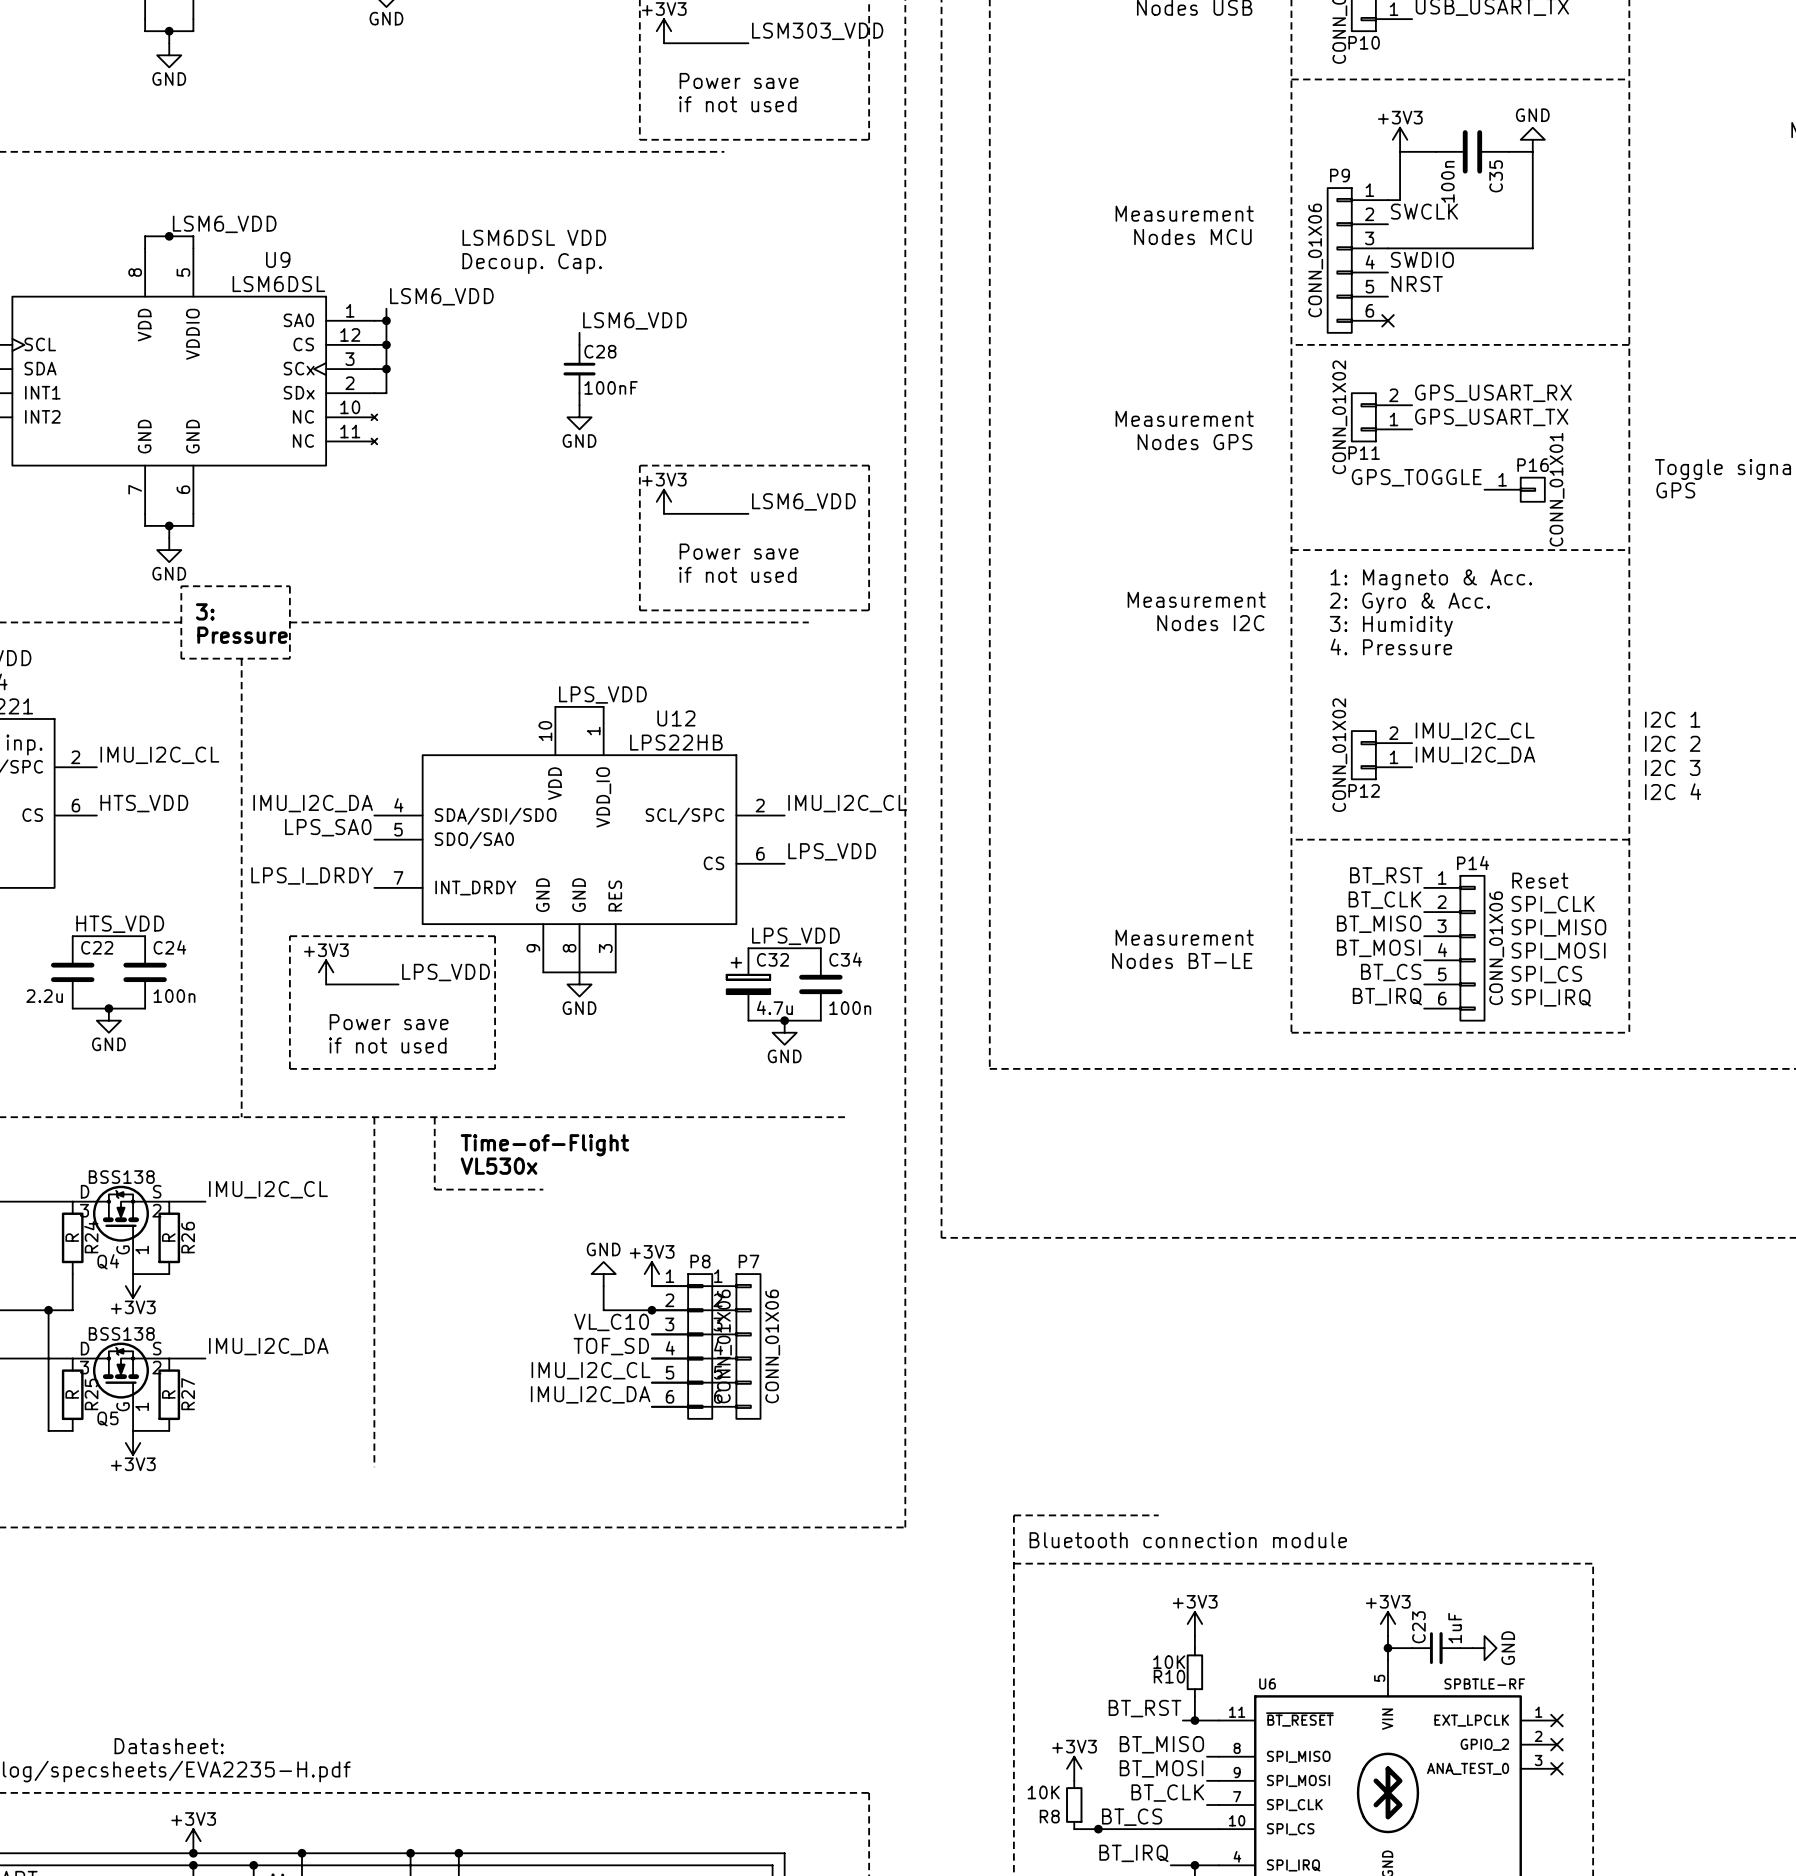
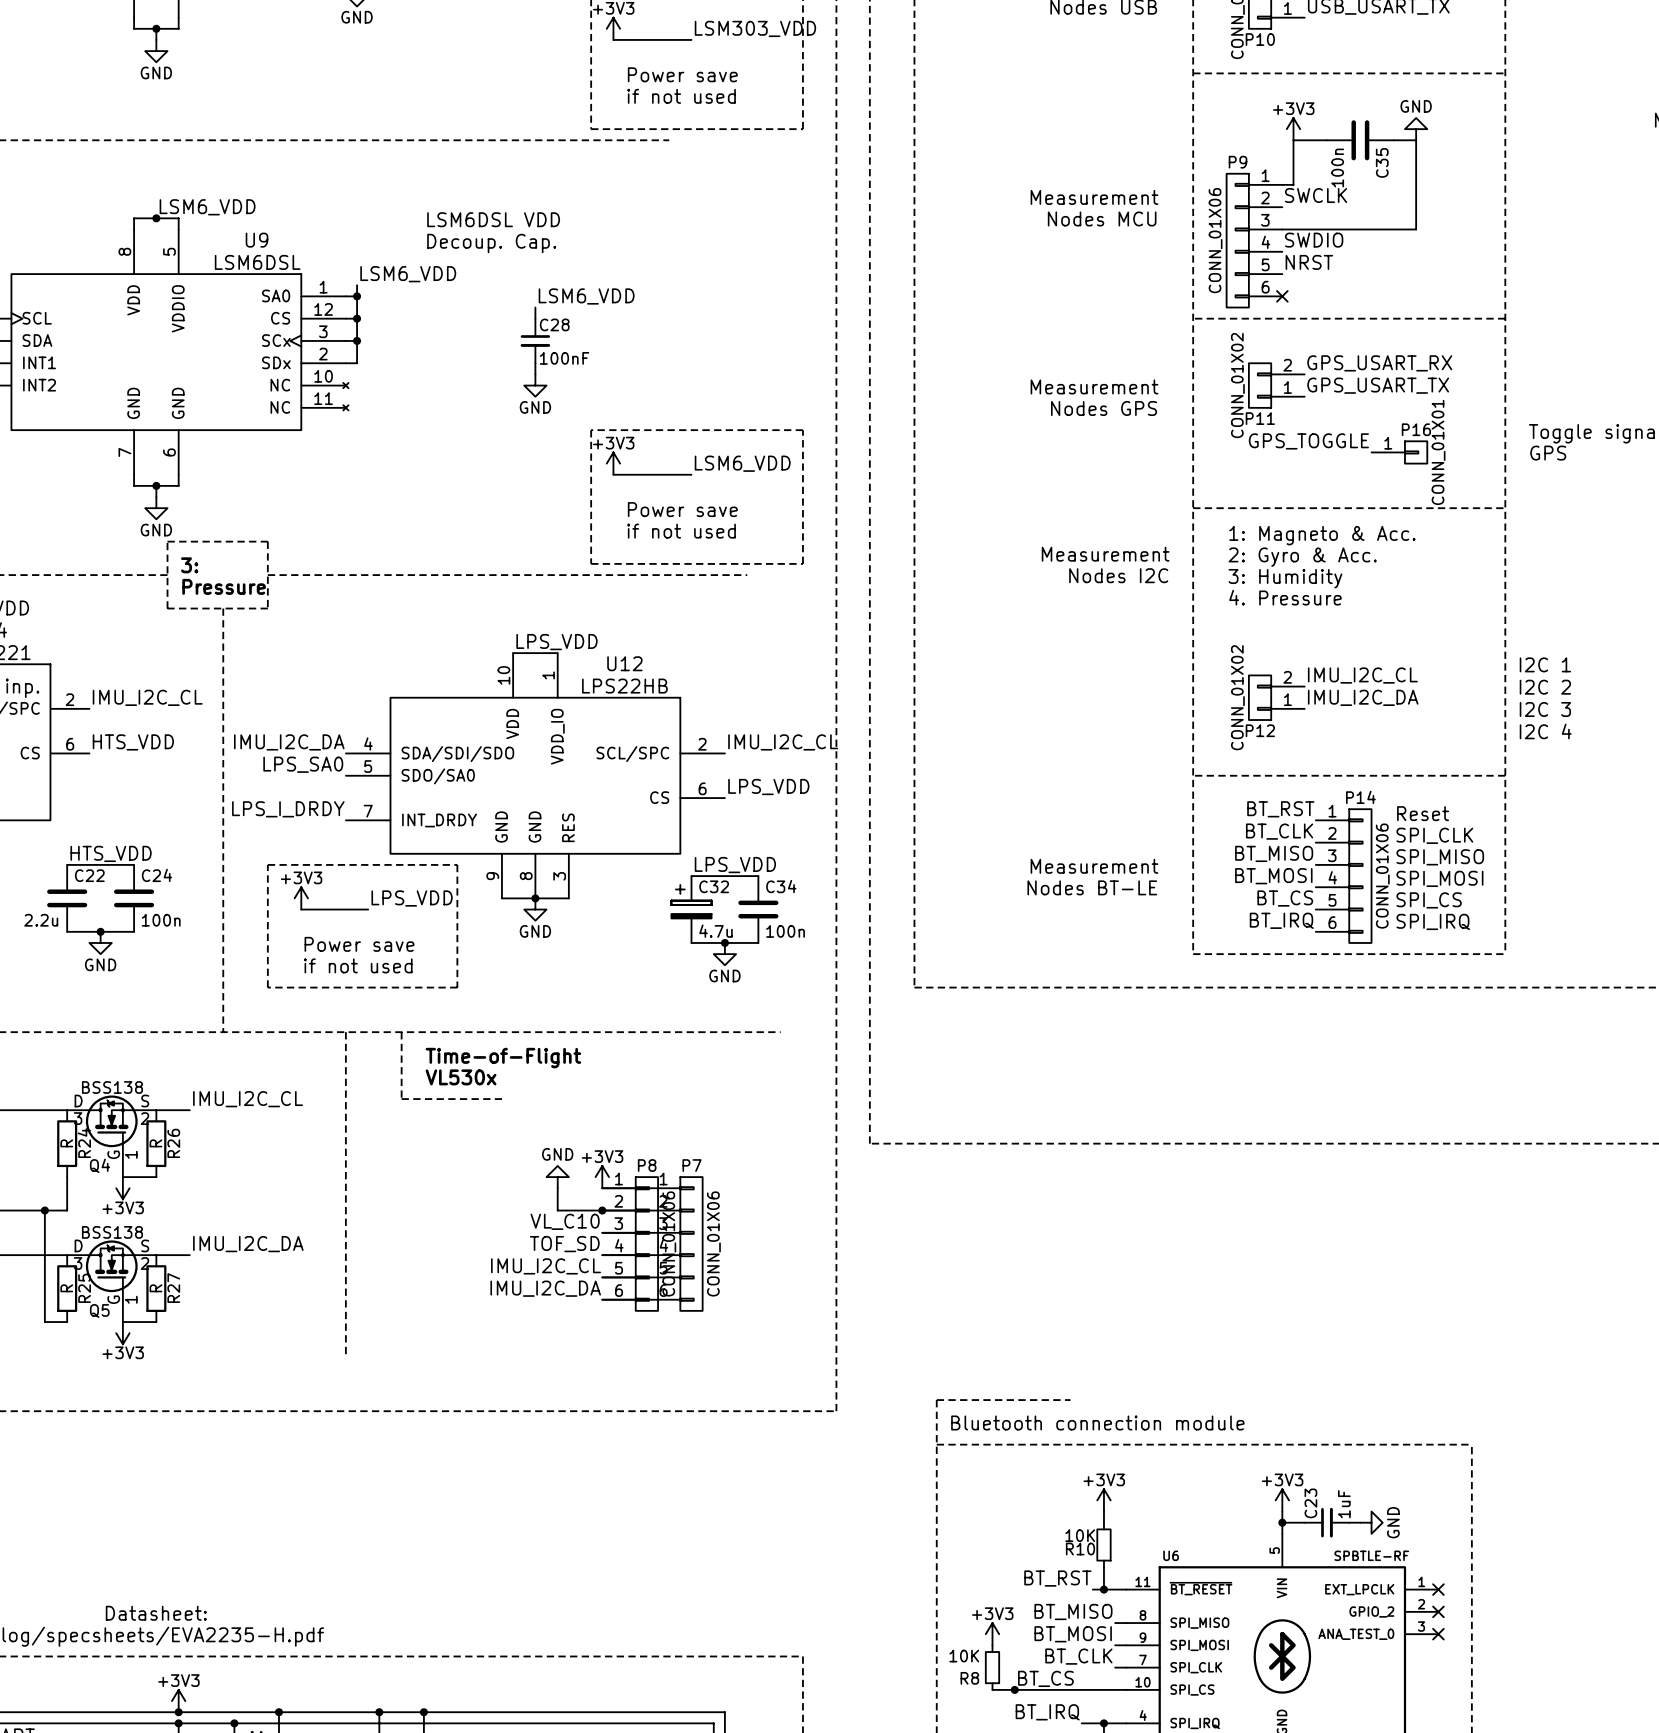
junction: none -> (535, 898)

